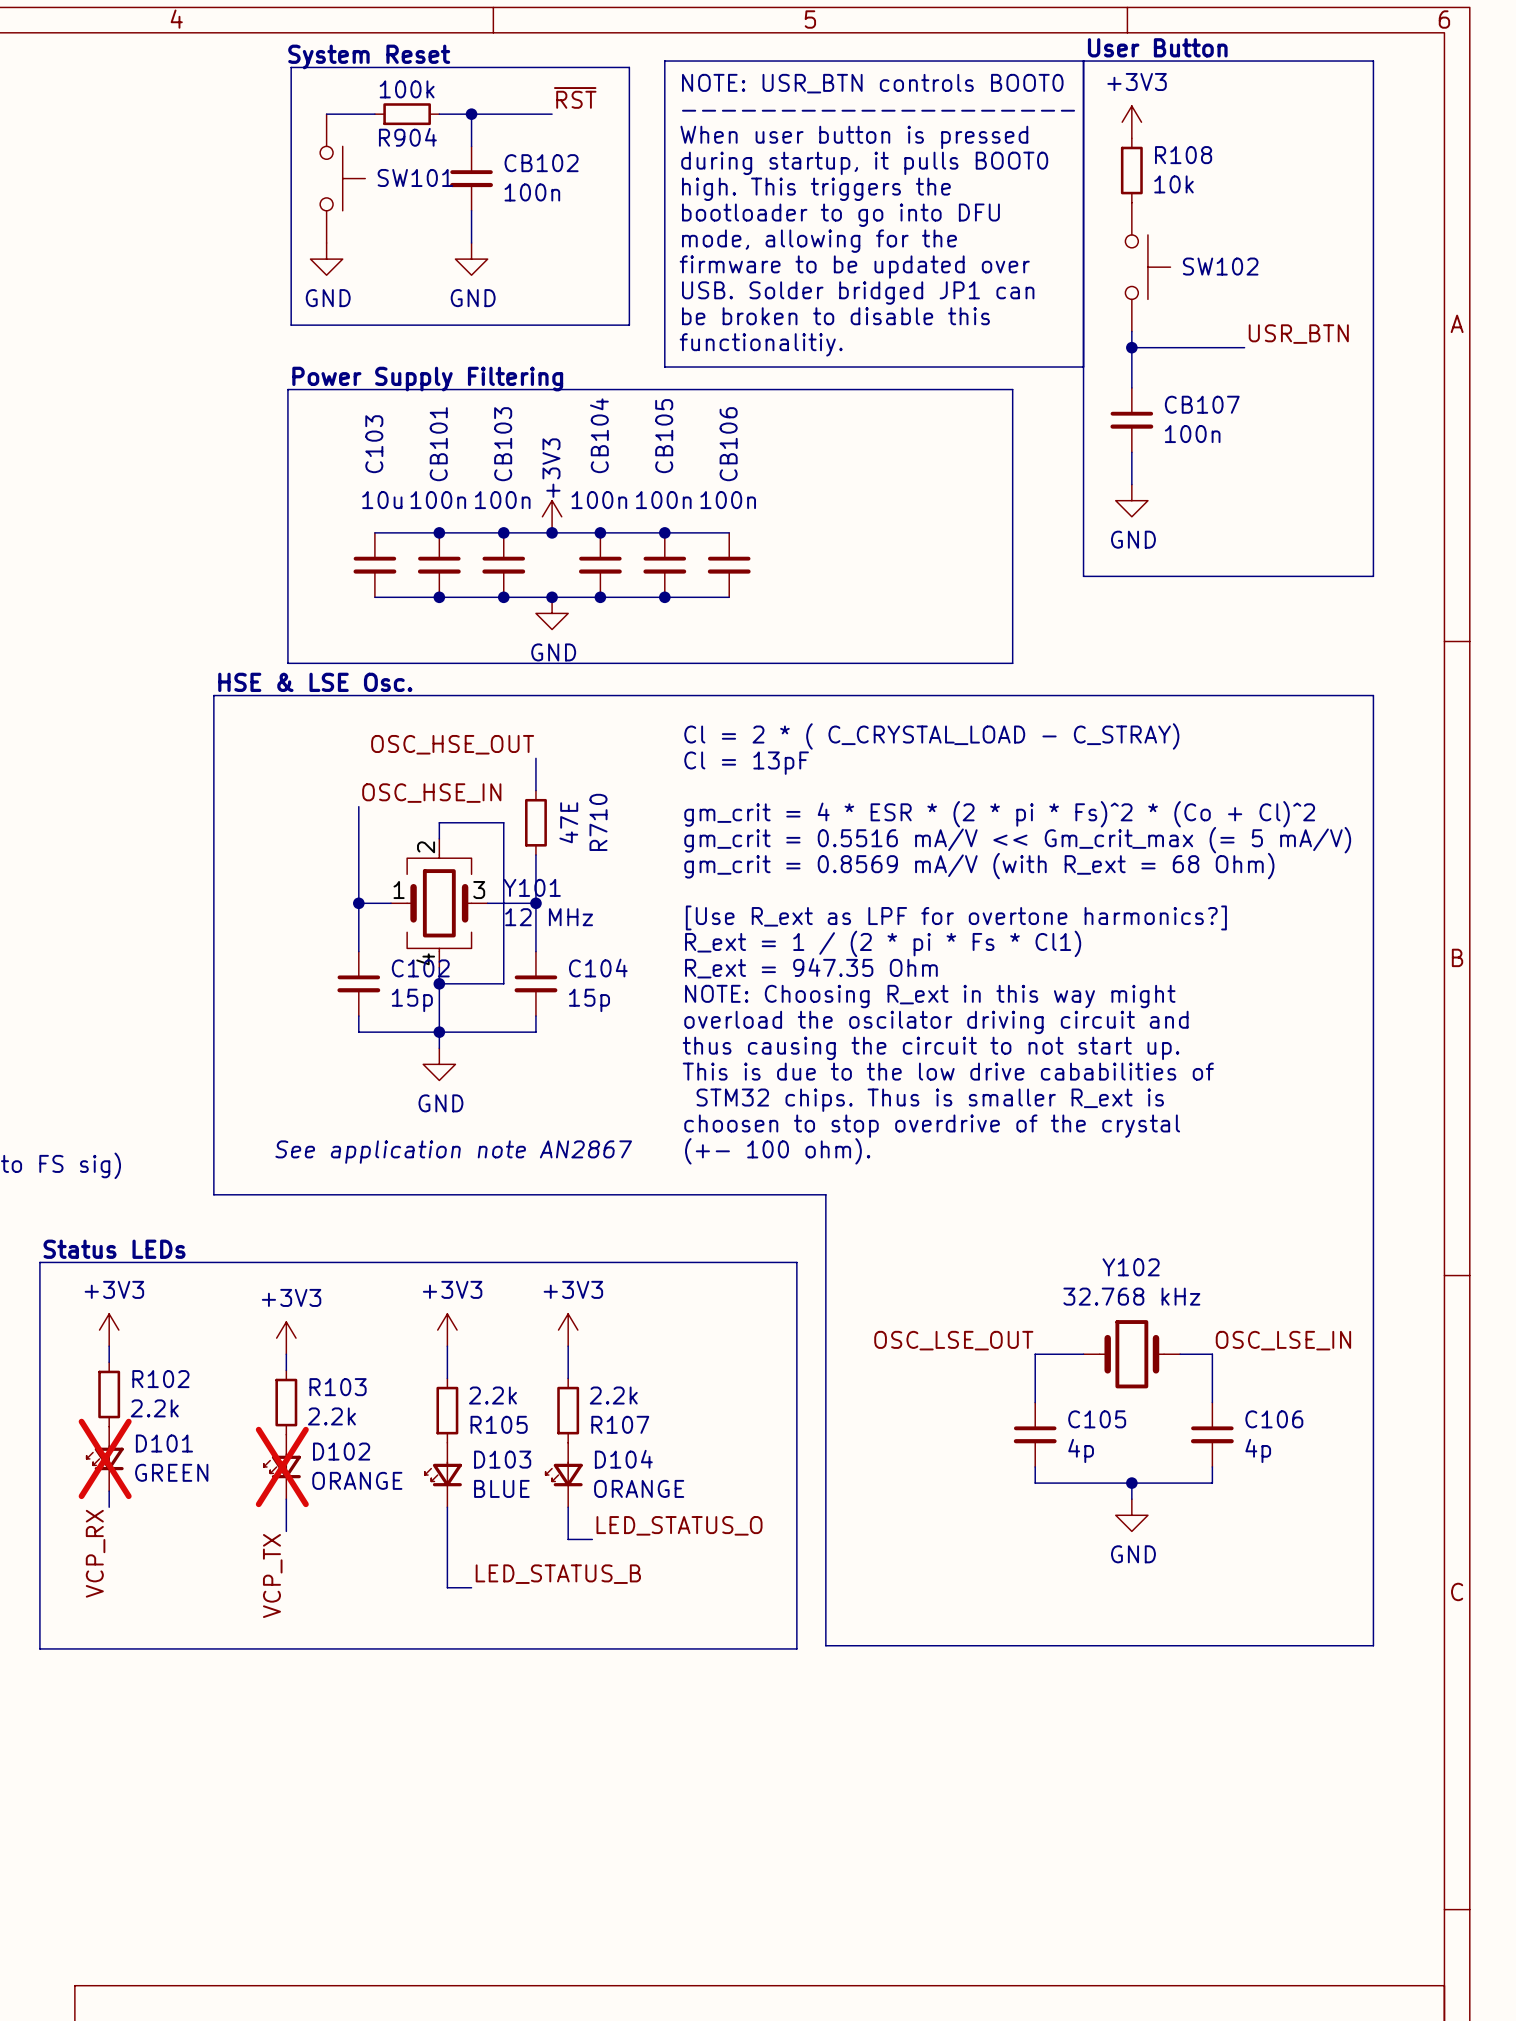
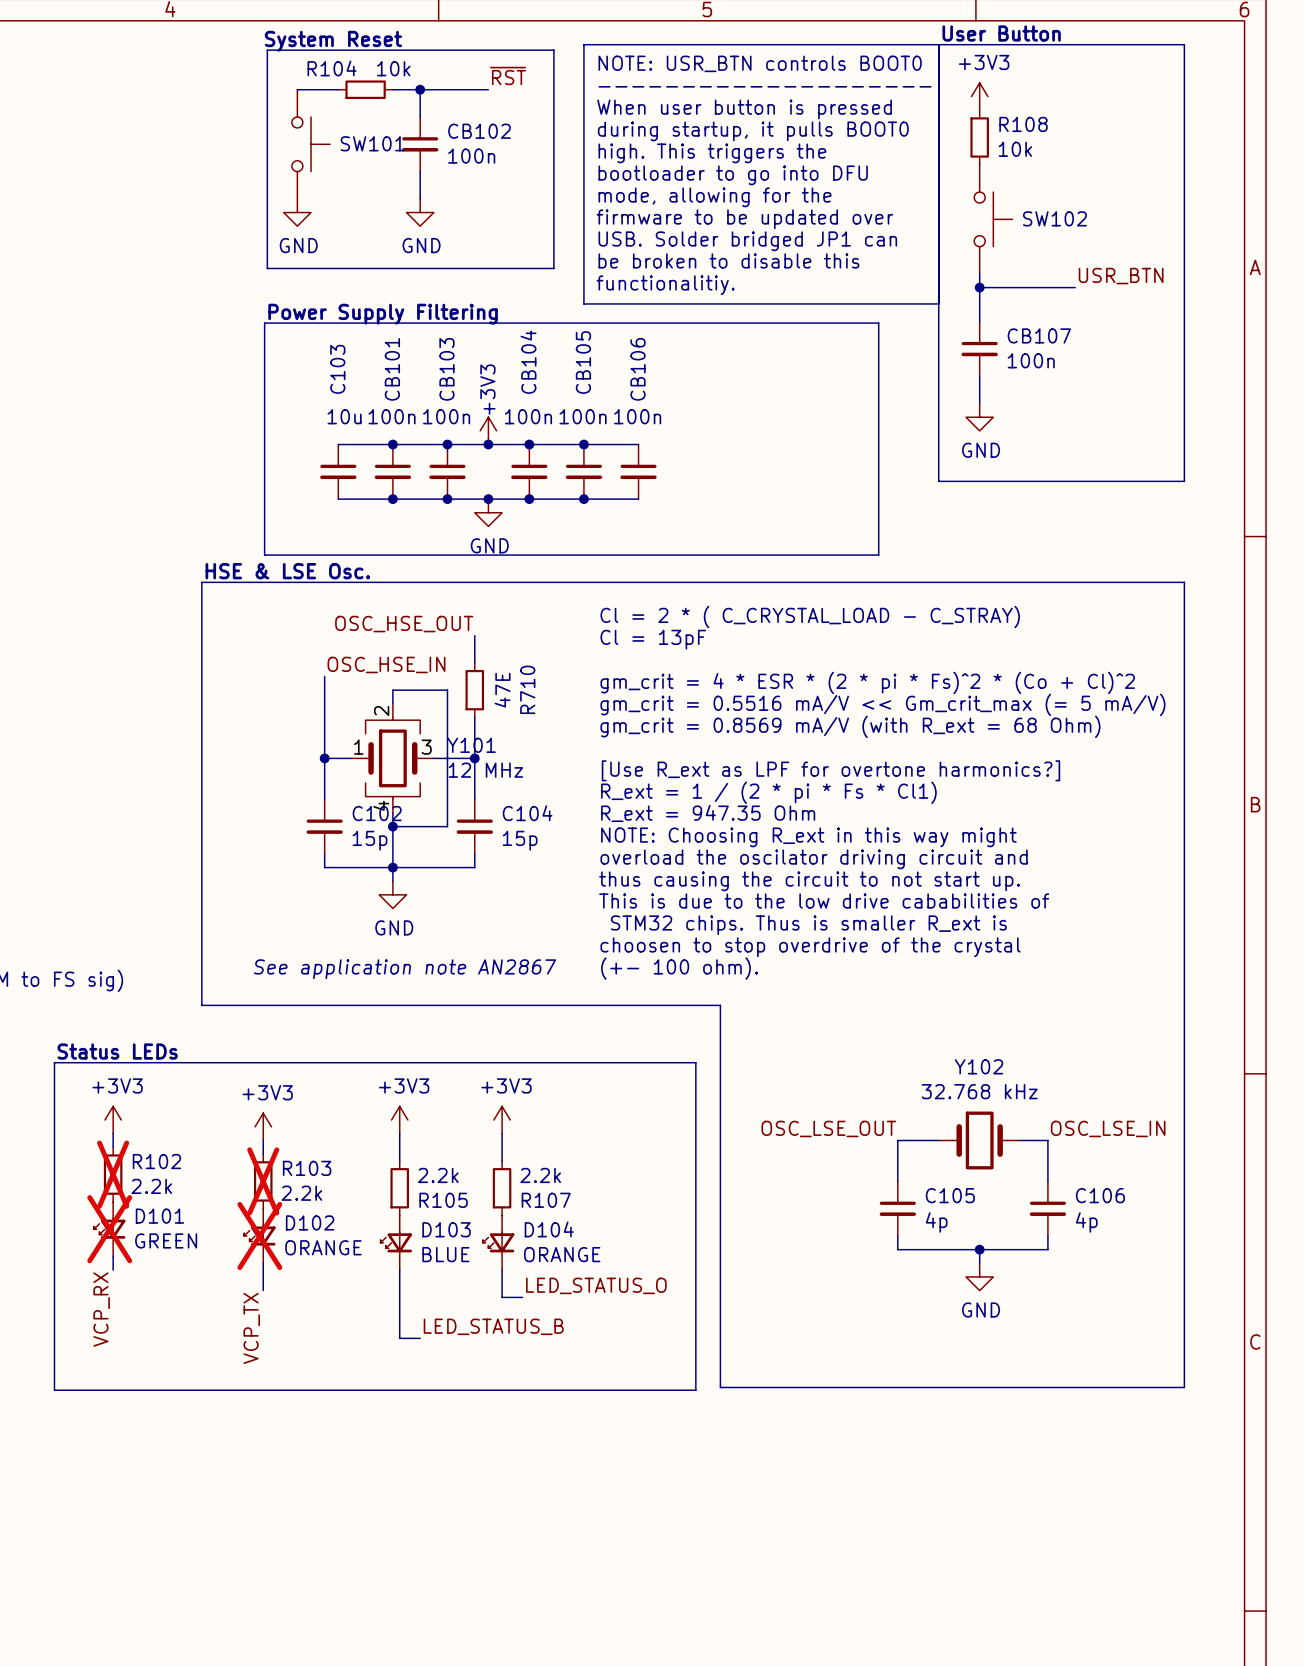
R904 value: 100k (407, 89) -> 10k (393, 68)
R904 name: R904 (407, 137) -> R104 (332, 68)
R102 do-not-place cross: none -> (113, 1174)
R103 do-not-place cross: none -> (263, 1181)

